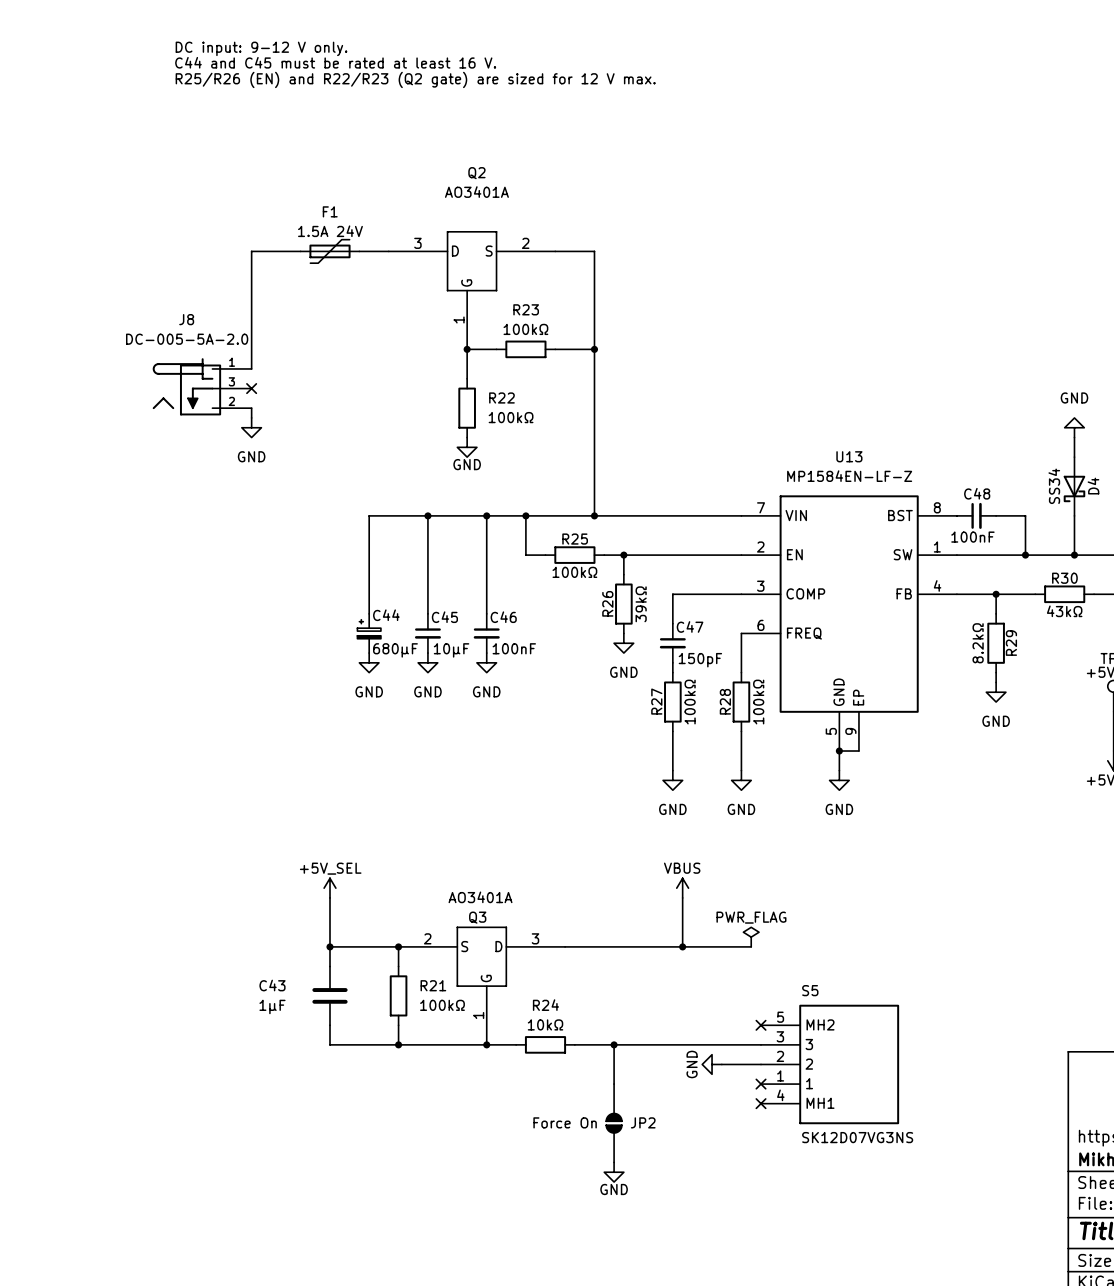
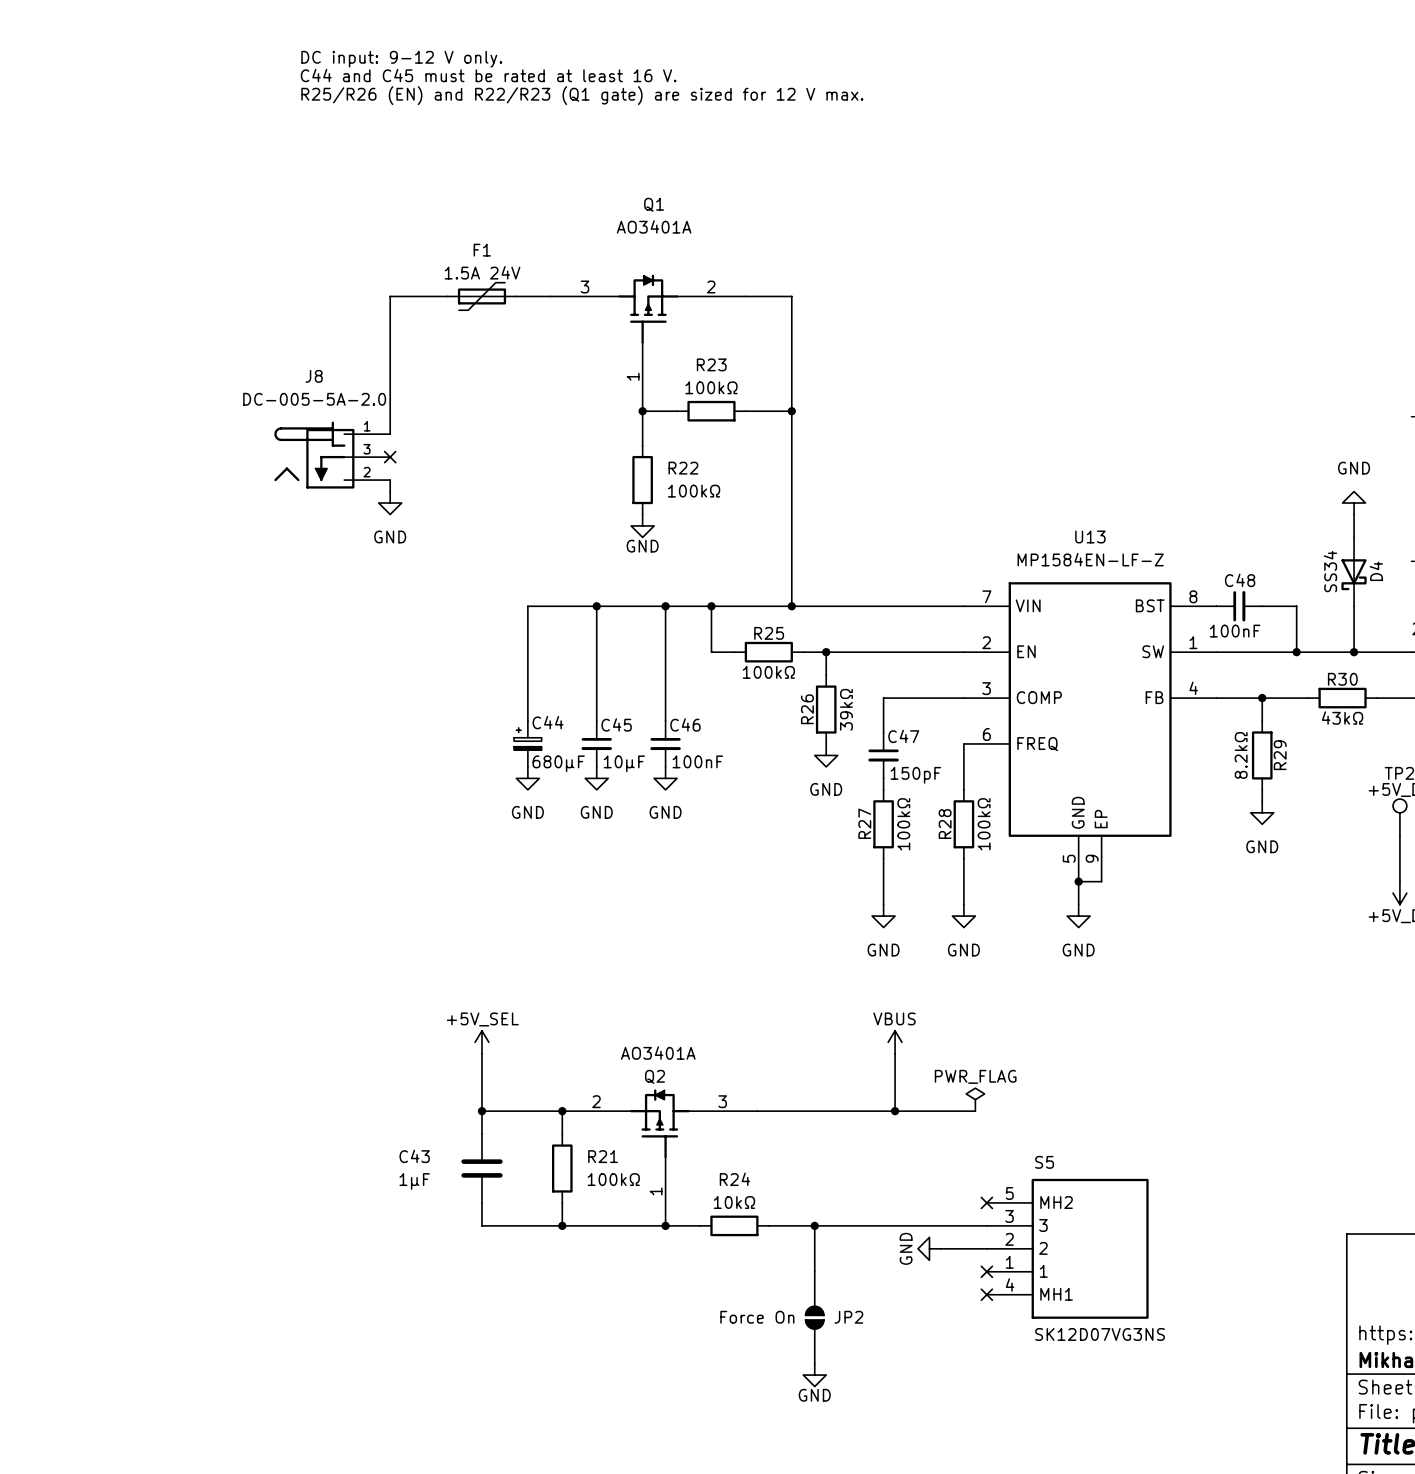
text: R25/R26 (EN) and R22/R23 (Q2 gate) are sized for 12 V max. (415, 79) -> R25/R26 (EN) and R22/R23 (Q1 gate) are sized for 12 V max. (582, 95)
Q2 name position: Q2 (476, 173) -> Q2 (655, 1076)
Q2 symbol: [388, 231, 556, 350] -> [562, 1089, 758, 1226]
Q1: none -> AO3401A (648, 342)
Q3: AO3401A (481, 985) -> none

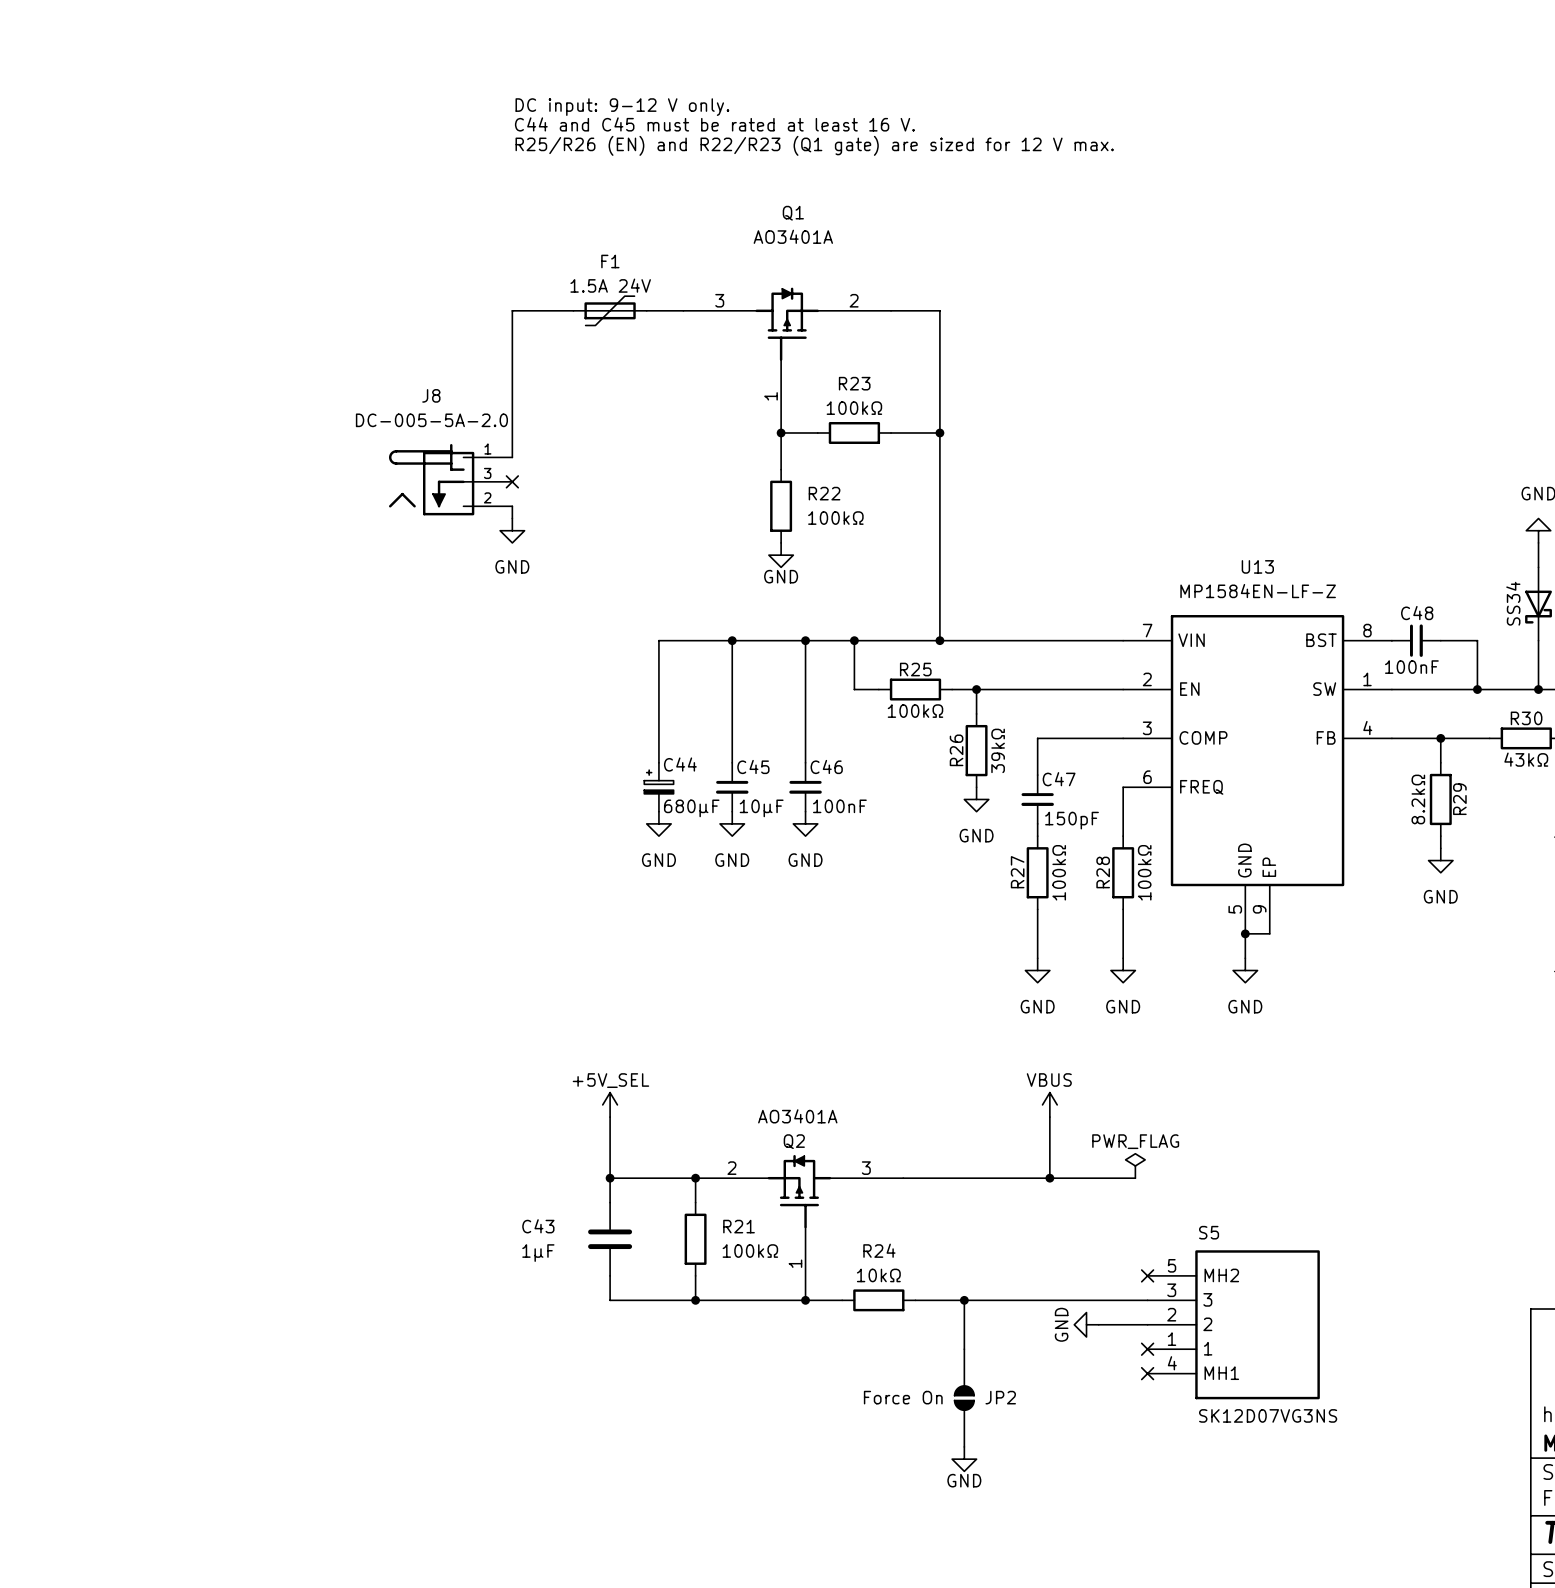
text position: DC input: 9-12 V only. (401, 59) -> DC input: 9-12 V only. (622, 107)
text position: C44 and C45 must be rated at least 16 V. (488, 75) -> C44 and C45 must be rated at least 16 V. (714, 124)
text position: R25/R26 (EN) and R22/R23 (Q1 gate) are sized for 12 V max. (582, 95) -> R25/R26 (EN) and R22/R23 (Q1 gate) are sized for 12 V max. (814, 145)

